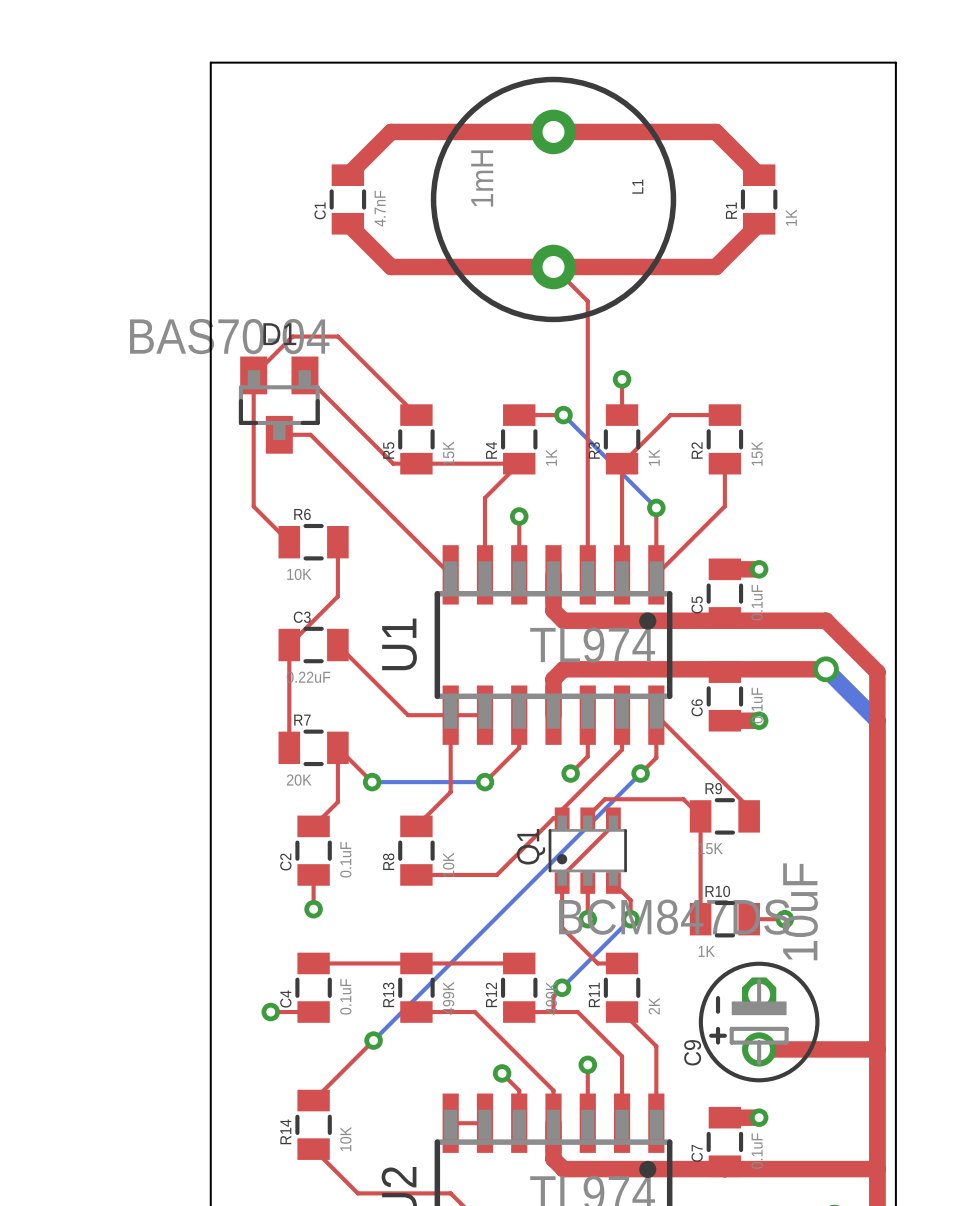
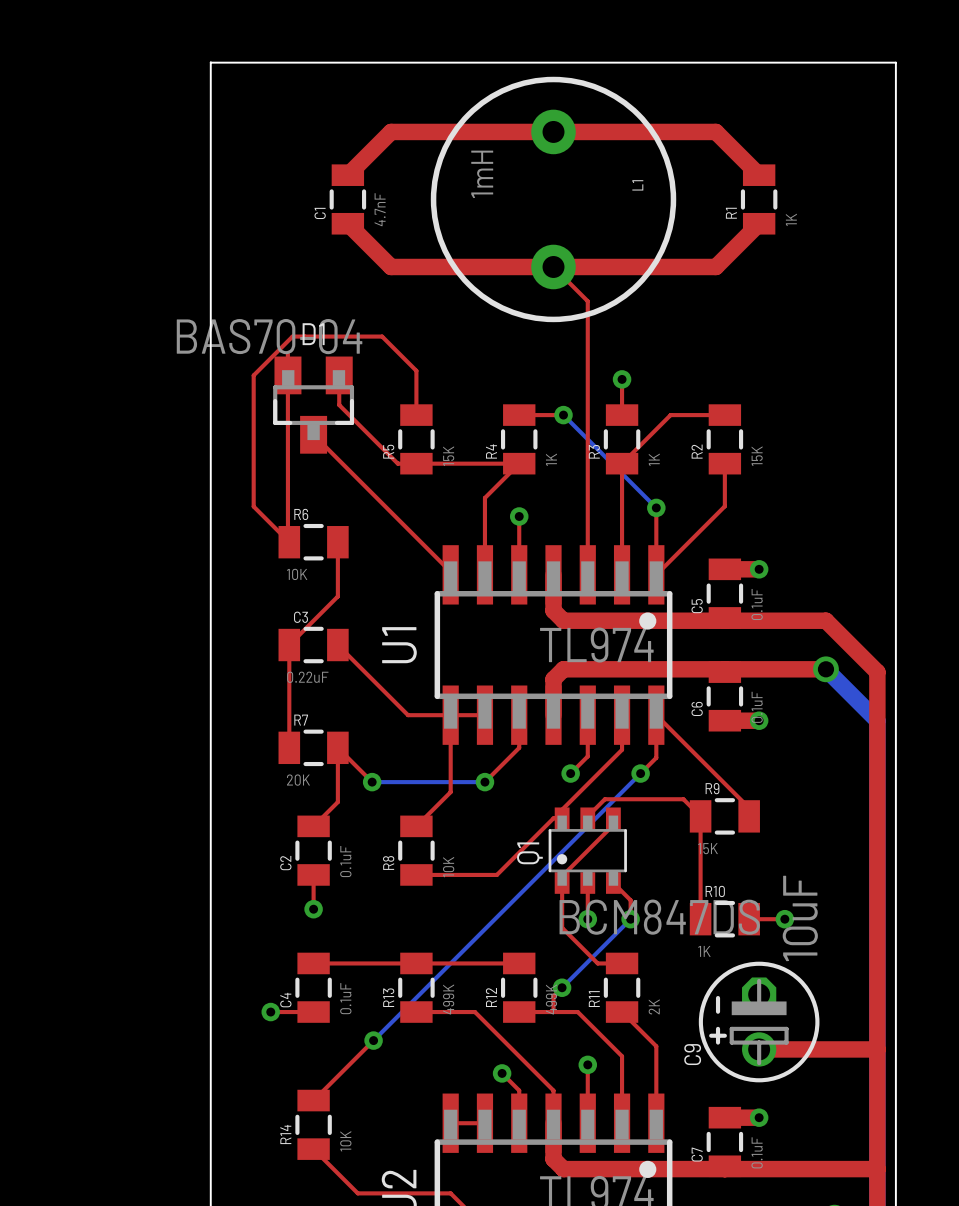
top track: (337, 336) (416, 415) -> (337, 336) (382, 336) (416, 370) (416, 415)
top track: none -> (287, 353) (287, 540)
top track: (304, 375) (393, 463) (397, 463) -> (339, 375) (339, 405) (397, 463)
D1 position: (279, 405) -> (313, 405)
top track: (279, 434) (310, 434) (450, 574) -> (310, 434) (313, 434) (450, 571) (450, 574)

